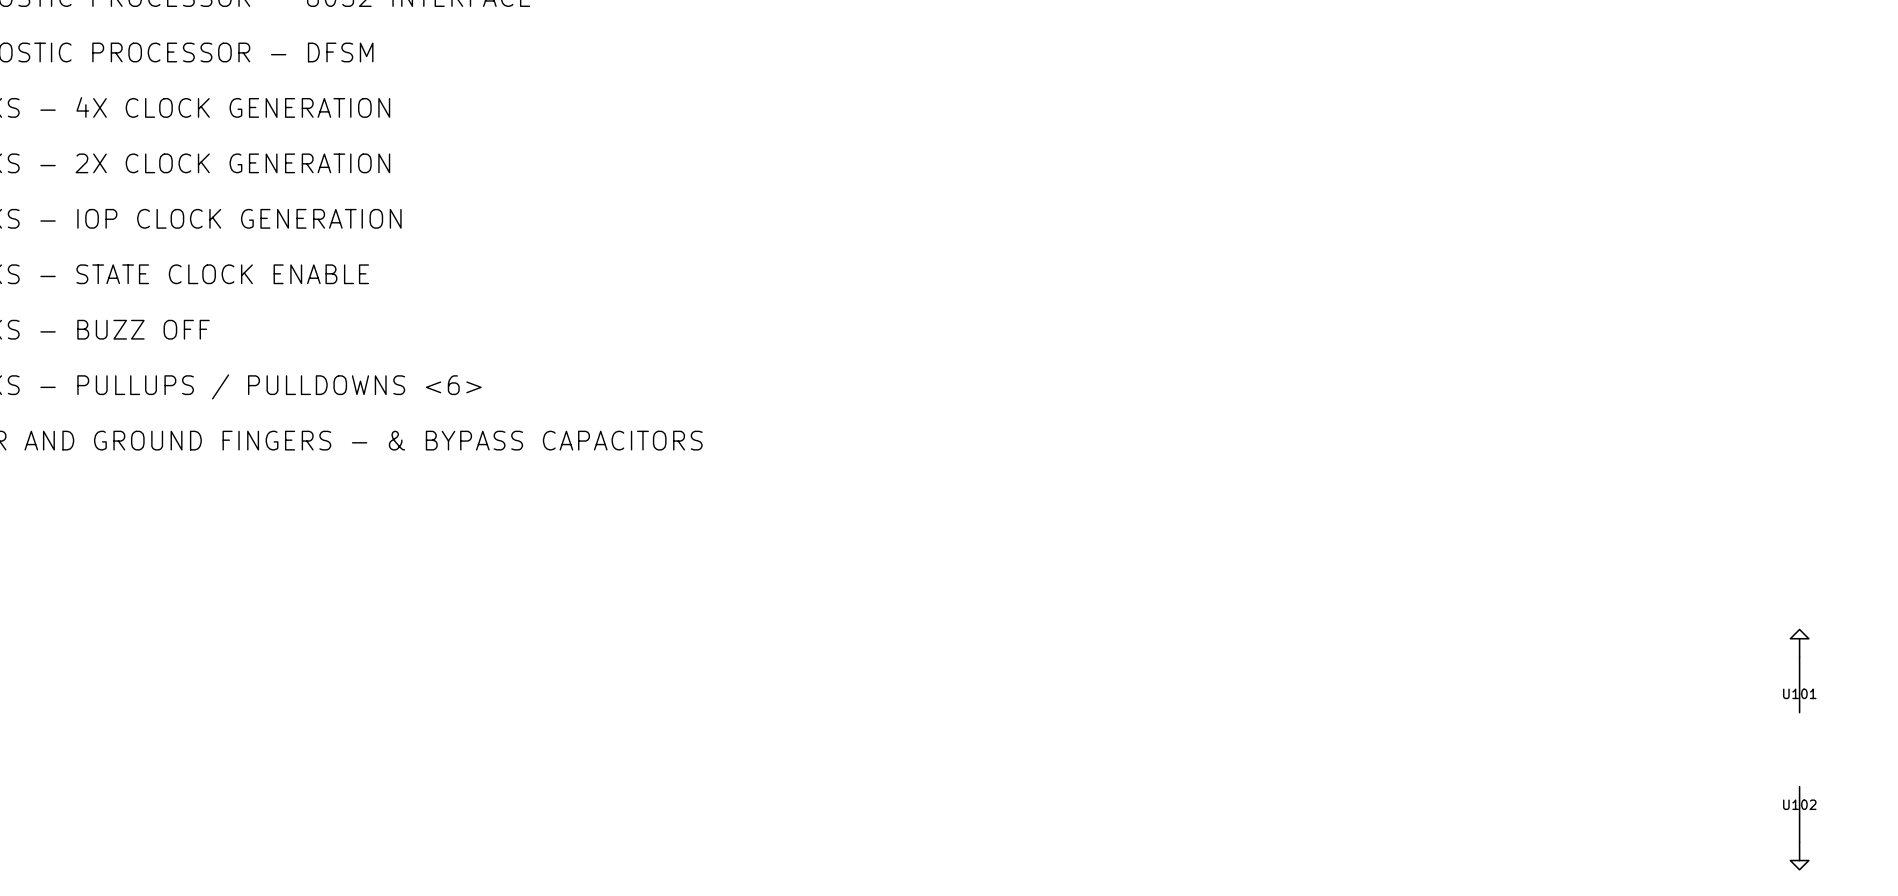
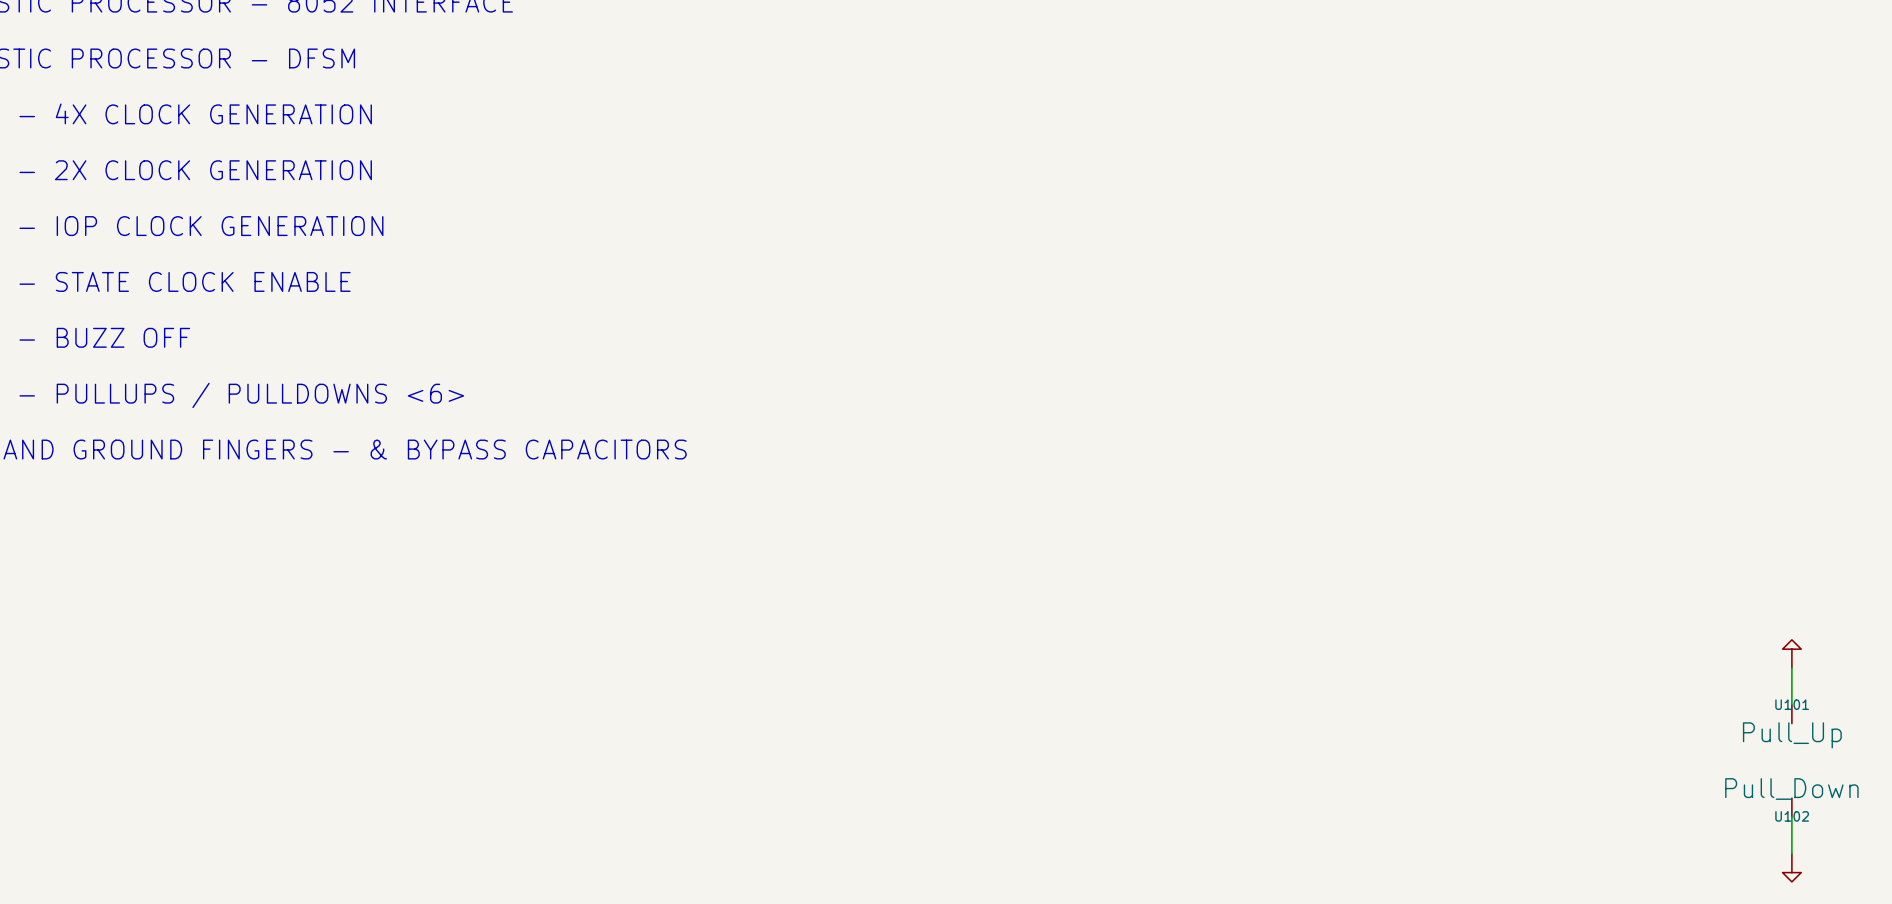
U101 value: none -> Pull_Up (1792, 735)
U102 value: none -> Pull_Down (1791, 789)

